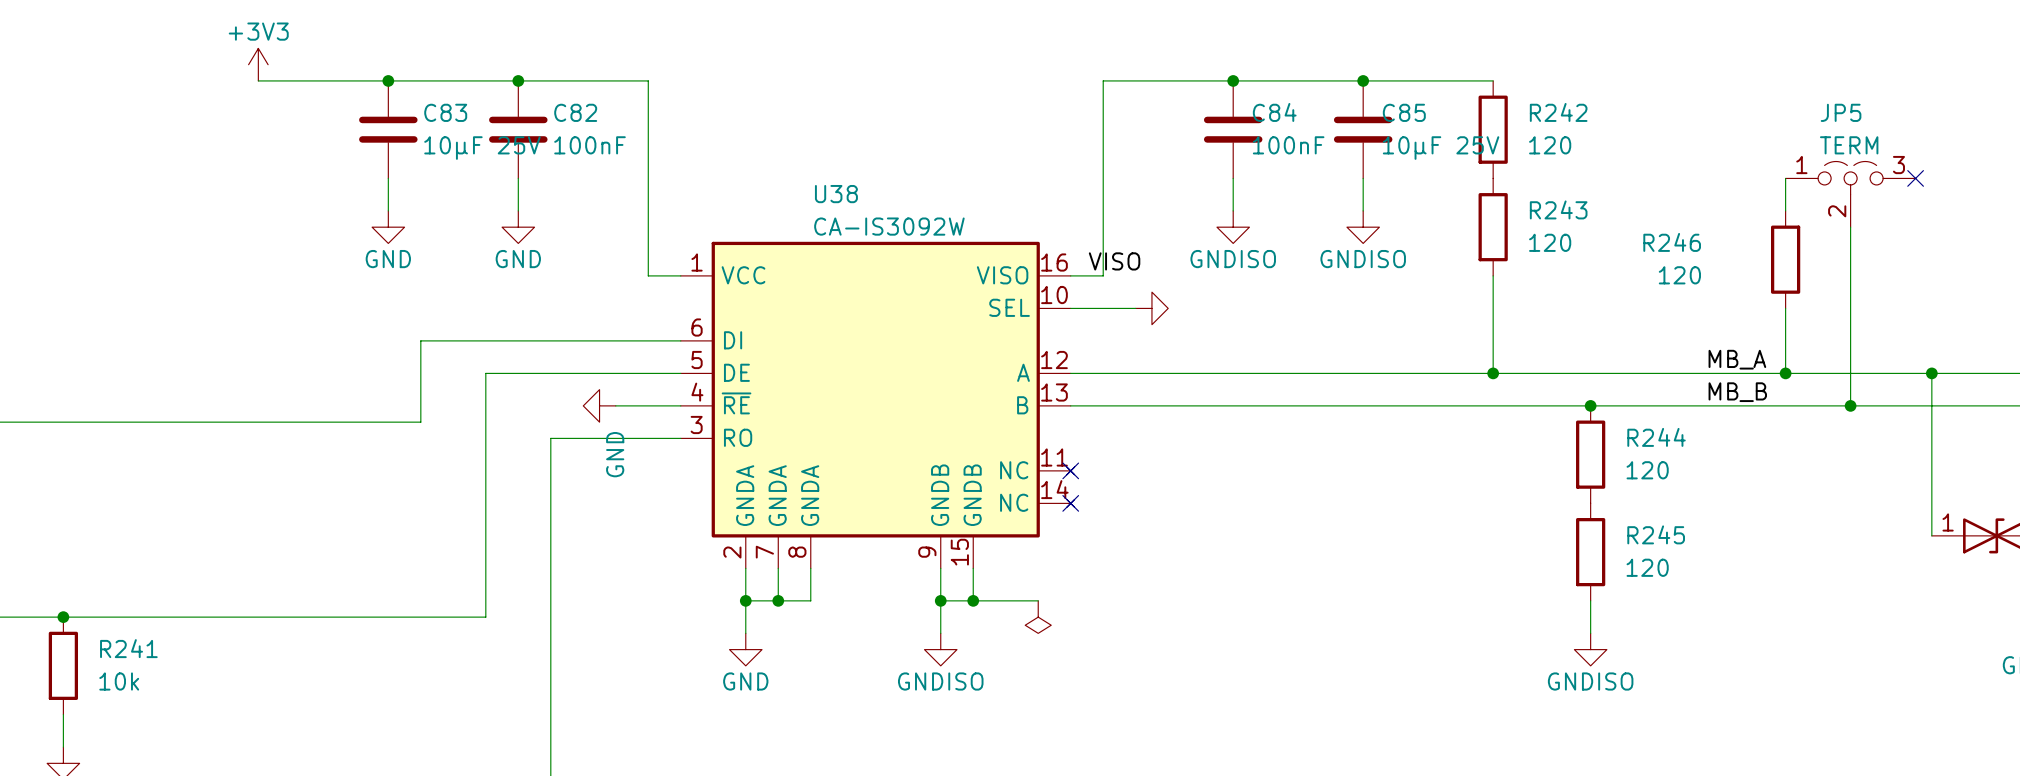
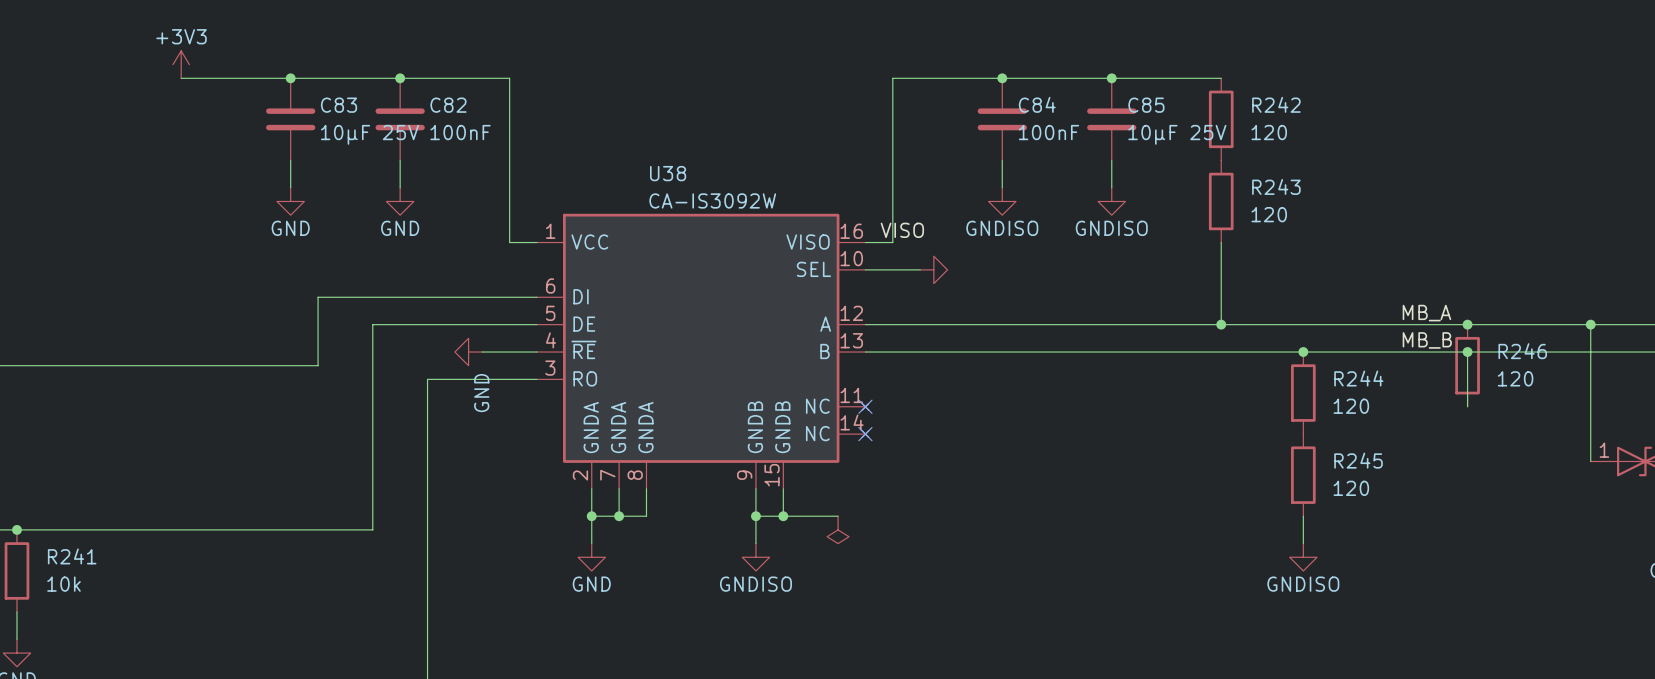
wire: (1785, 178) (1785, 210) -> none
no-connect mark: (1915, 178) -> none
JP5: TERM (1850, 194) -> none
wire: (1850, 227) (1850, 405) -> none
R246 name position: R246 (1672, 242) -> R246 (1522, 351)
R246 position: (1785, 259) -> (1467, 365)
R246 value position: 120 (1679, 275) -> 120 (1515, 378)
wire: (1785, 308) (1785, 373) -> (1467, 352) (1467, 406)
junction position: (1850, 405) -> (1467, 352)

